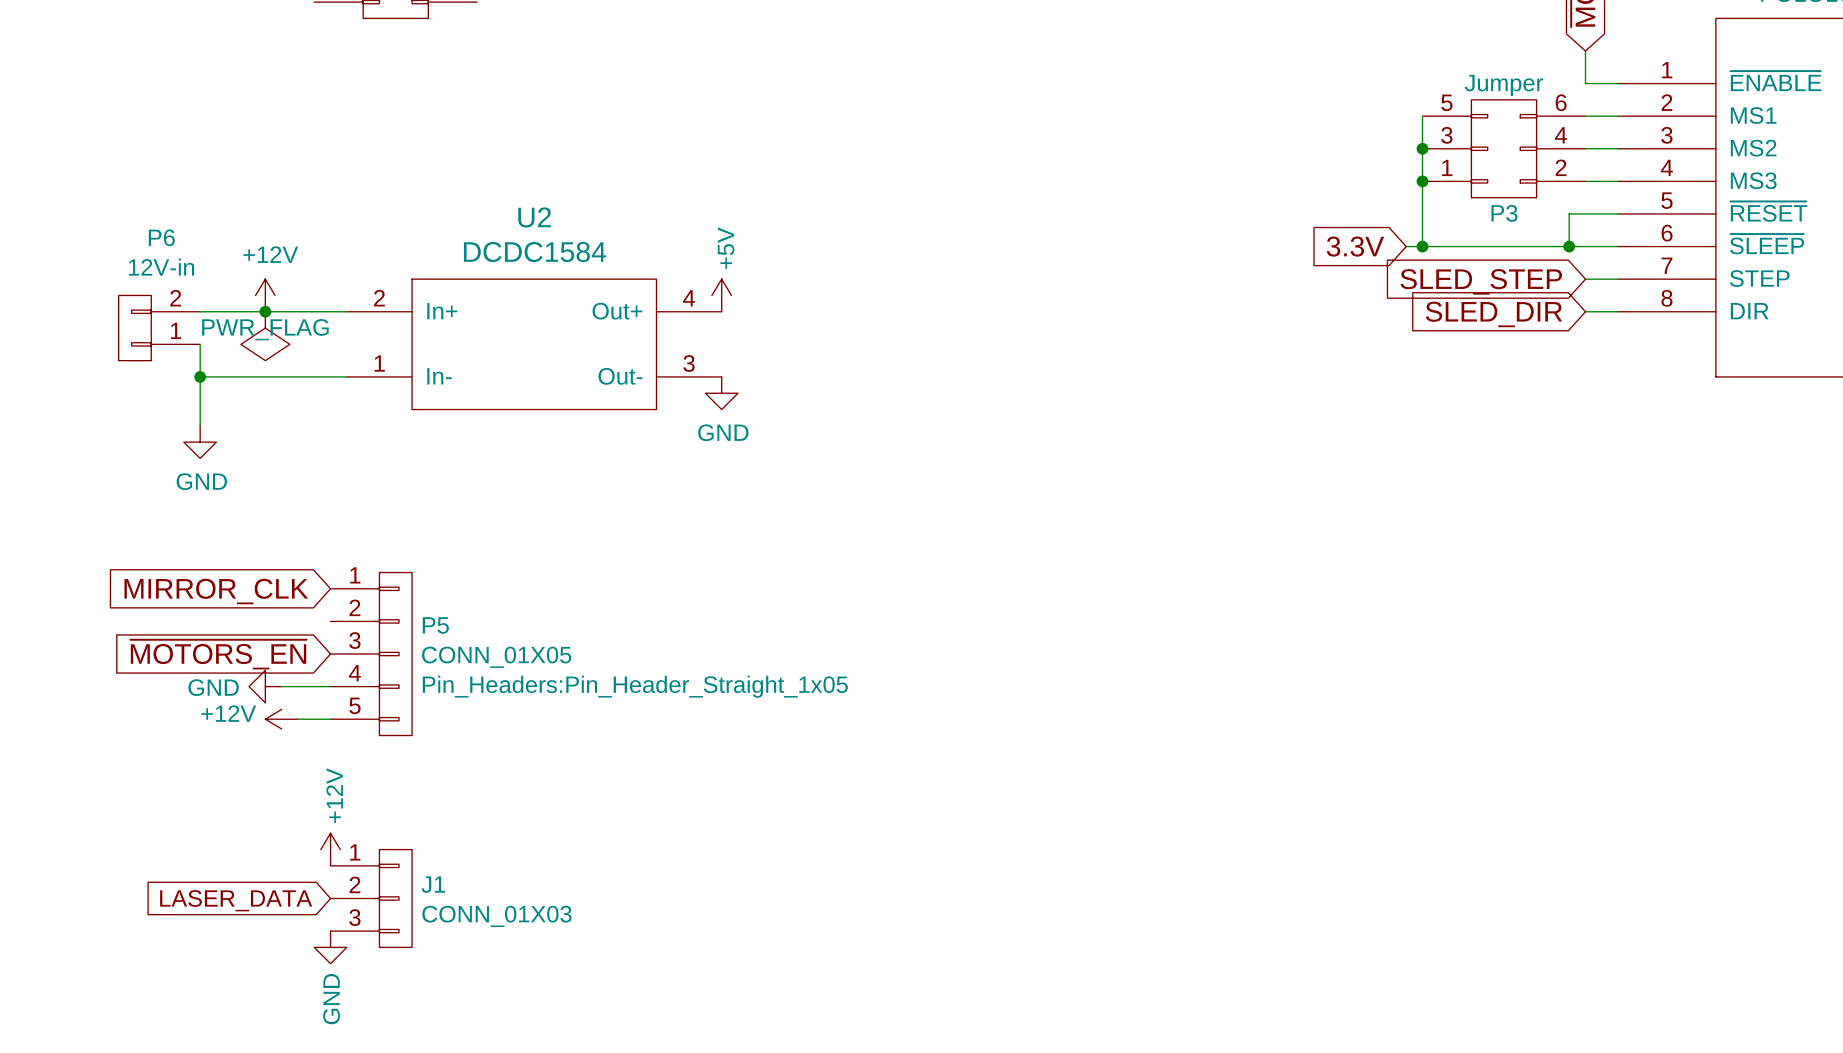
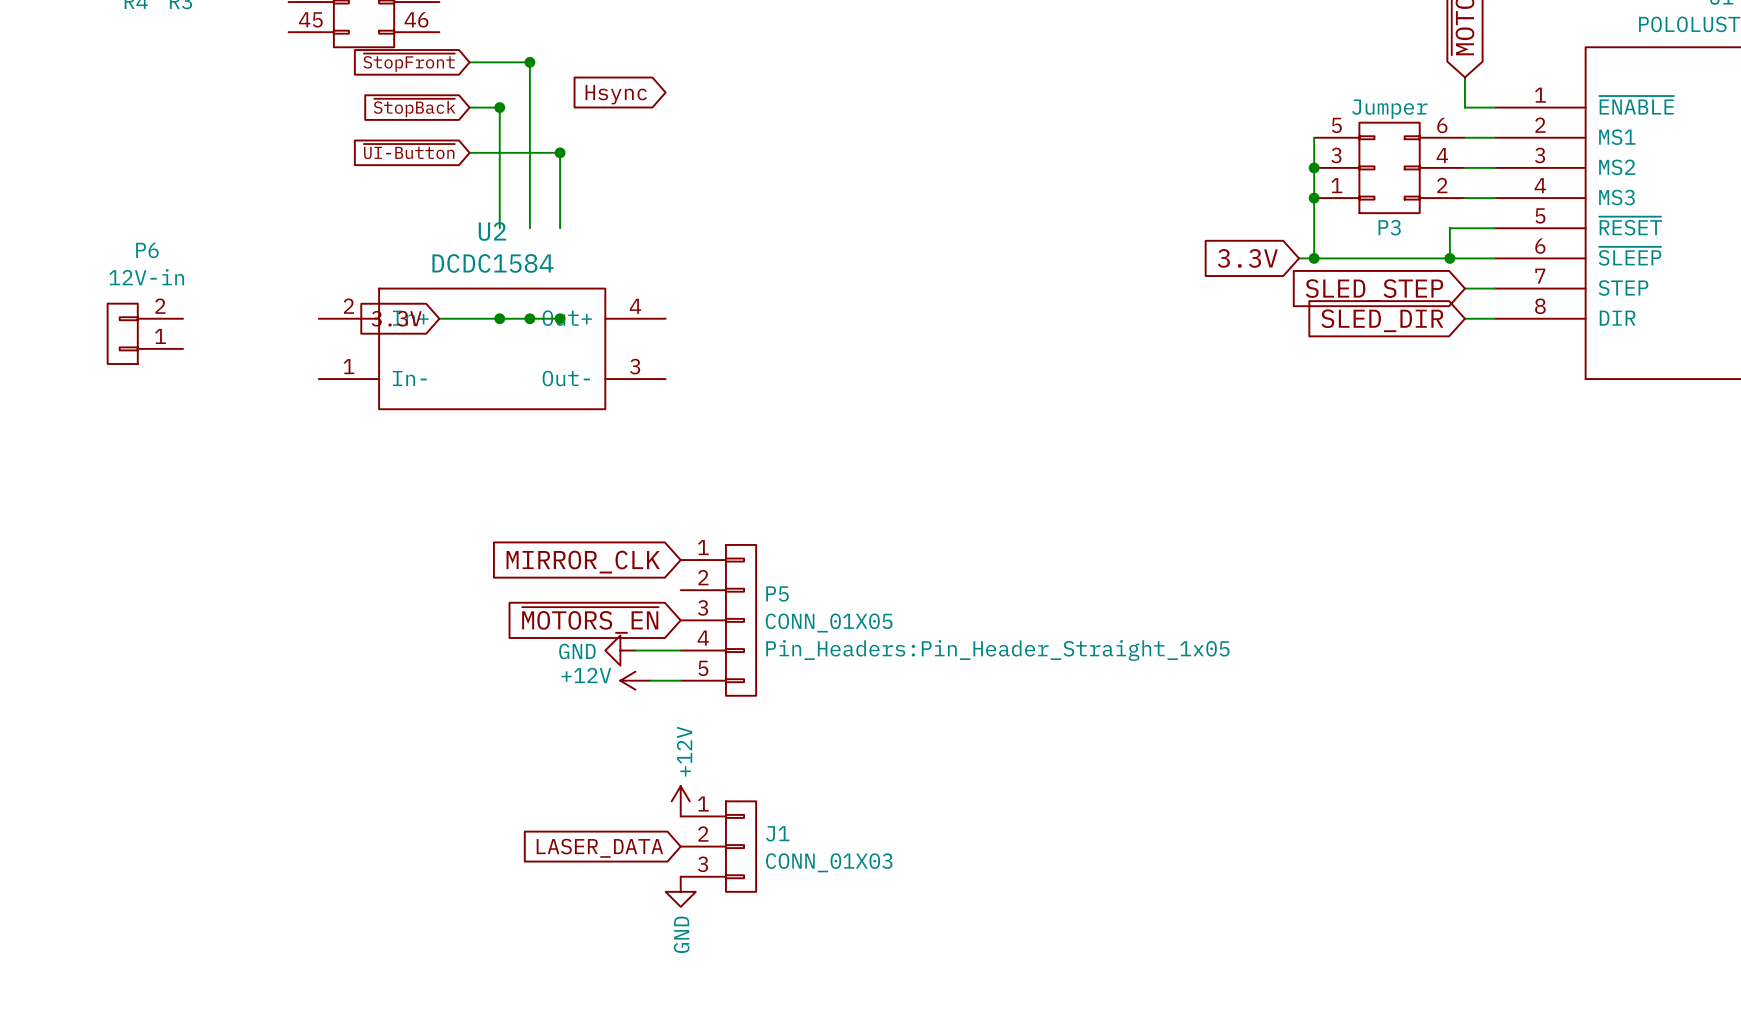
wire: none -> (469, 62) (529, 62) (529, 228)
junction: none -> (529, 62)
global label: none -> ~{StopFront} (409, 62)
global label: none -> Hsync (616, 94)
wire: none -> (469, 107) (499, 107) (499, 228)
junction: none -> (499, 107)
global label: none -> ~{StopBack} (414, 107)
global label: none -> ~{UI-Button} (409, 151)
wire: none -> (469, 152) (560, 152) (560, 228)
junction: none -> (560, 152)
power symbol: +12V (265, 295) -> none
power symbol: +5V (721, 295) -> none
wire: (200, 311) (346, 311) -> none
junction: (265, 311) -> none
global label: none -> 3.3V (396, 318)
wire: none -> (439, 318) (560, 318)
junction: none -> (499, 318)
junction: none -> (529, 318)
junction: none -> (560, 318)
power symbol: PWR_FLAG (265, 336) -> none
wire: (200, 344) (200, 425) -> none
wire: (200, 376) (346, 376) -> none
junction: (200, 376) -> none
power symbol: GND (721, 393) -> none
power symbol: GND (200, 442) -> none
global label: none -> MIRROR_CLK (583, 562)
global label: MIRROR_CLK (216, 591) -> none
global label: none -> ~{MOTORS_EN} (590, 620)
global label: ~{MOTORS_EN} (218, 654) -> none
P5 position: (371, 654) -> (718, 620)
power symbol: none -> GND (620, 650)
wire: none -> (635, 650) (680, 650)
power symbol: GND (265, 686) -> none
wire: (281, 686) (330, 686) -> none
power symbol: none -> +12V (635, 680)
wire: none -> (650, 680) (680, 680)
power symbol: +12V (281, 719) -> none
wire: (297, 719) (330, 719) -> none
power symbol: none -> +12V (680, 801)
power symbol: +12V (330, 849) -> none
global label: none -> LASER_DATA (599, 848)
J1 position: (371, 898) -> (718, 846)
global label: LASER_DATA (236, 900) -> none
power symbol: none -> GND (680, 891)
power symbol: GND (330, 947) -> none

